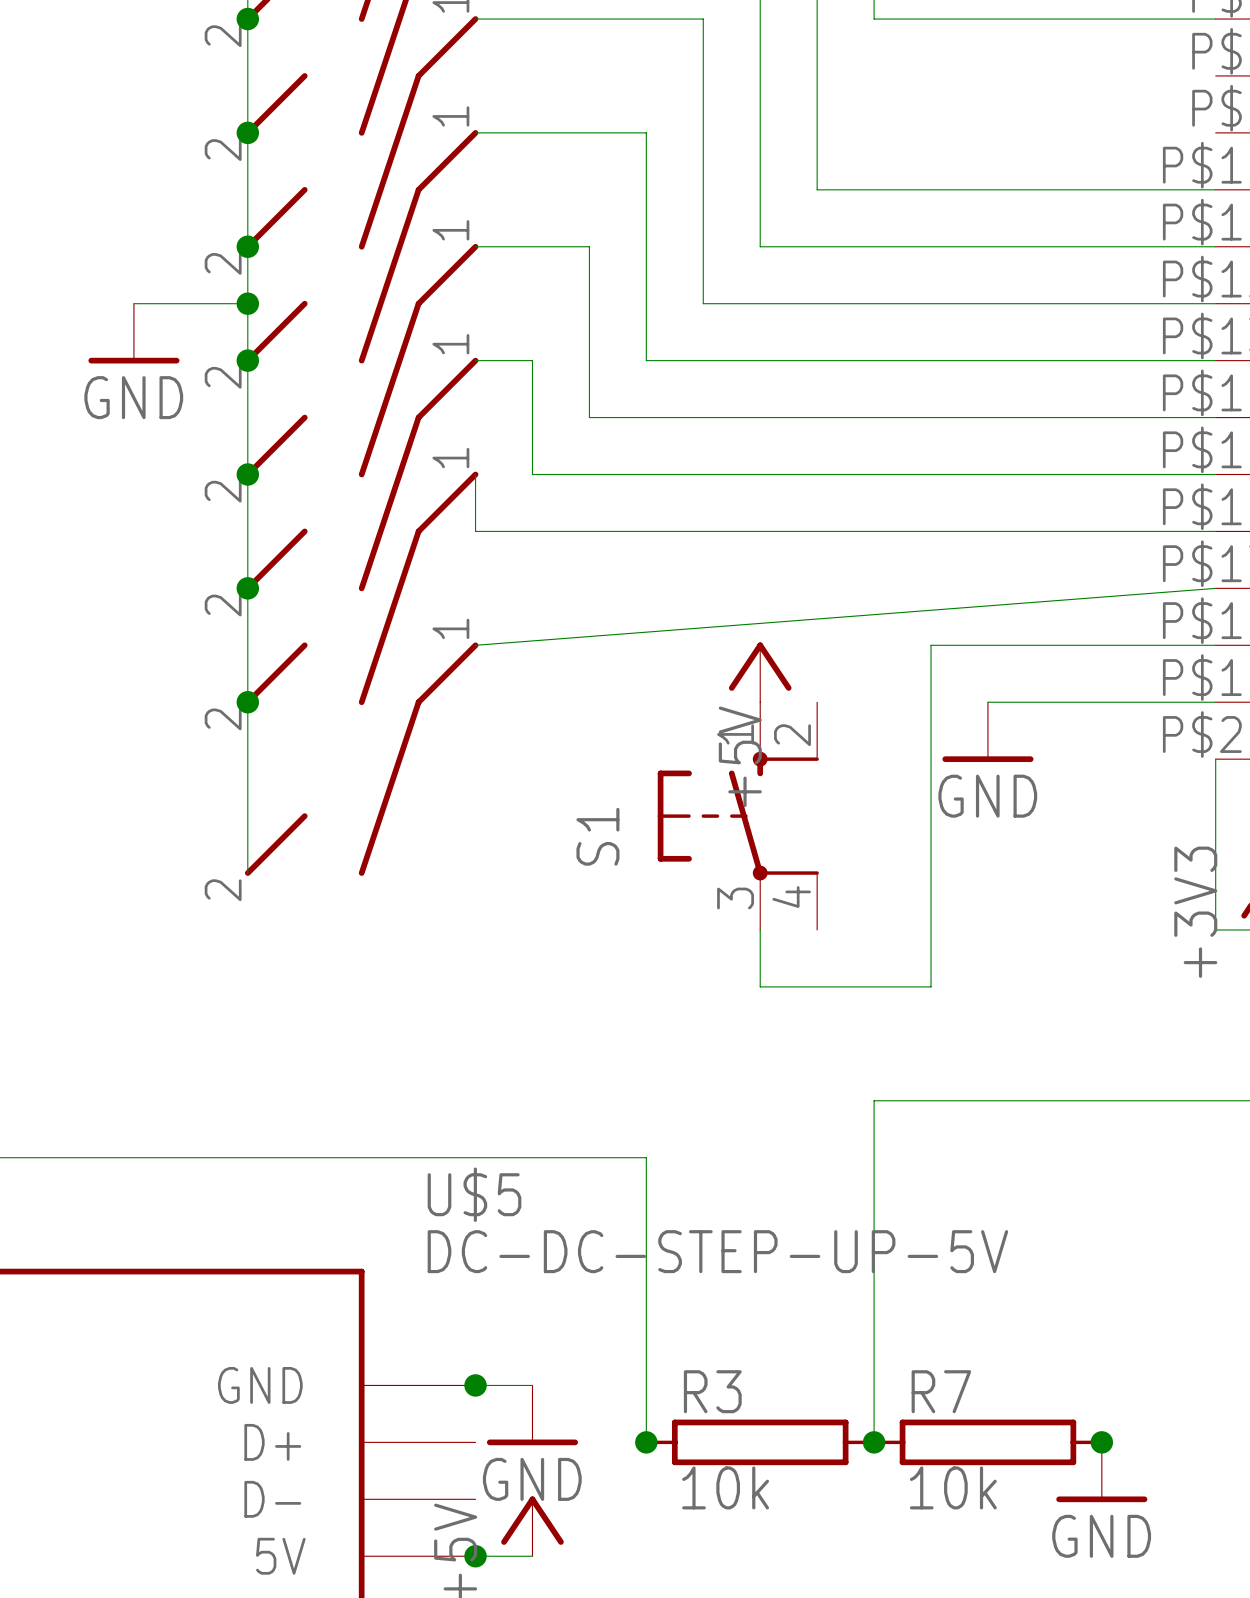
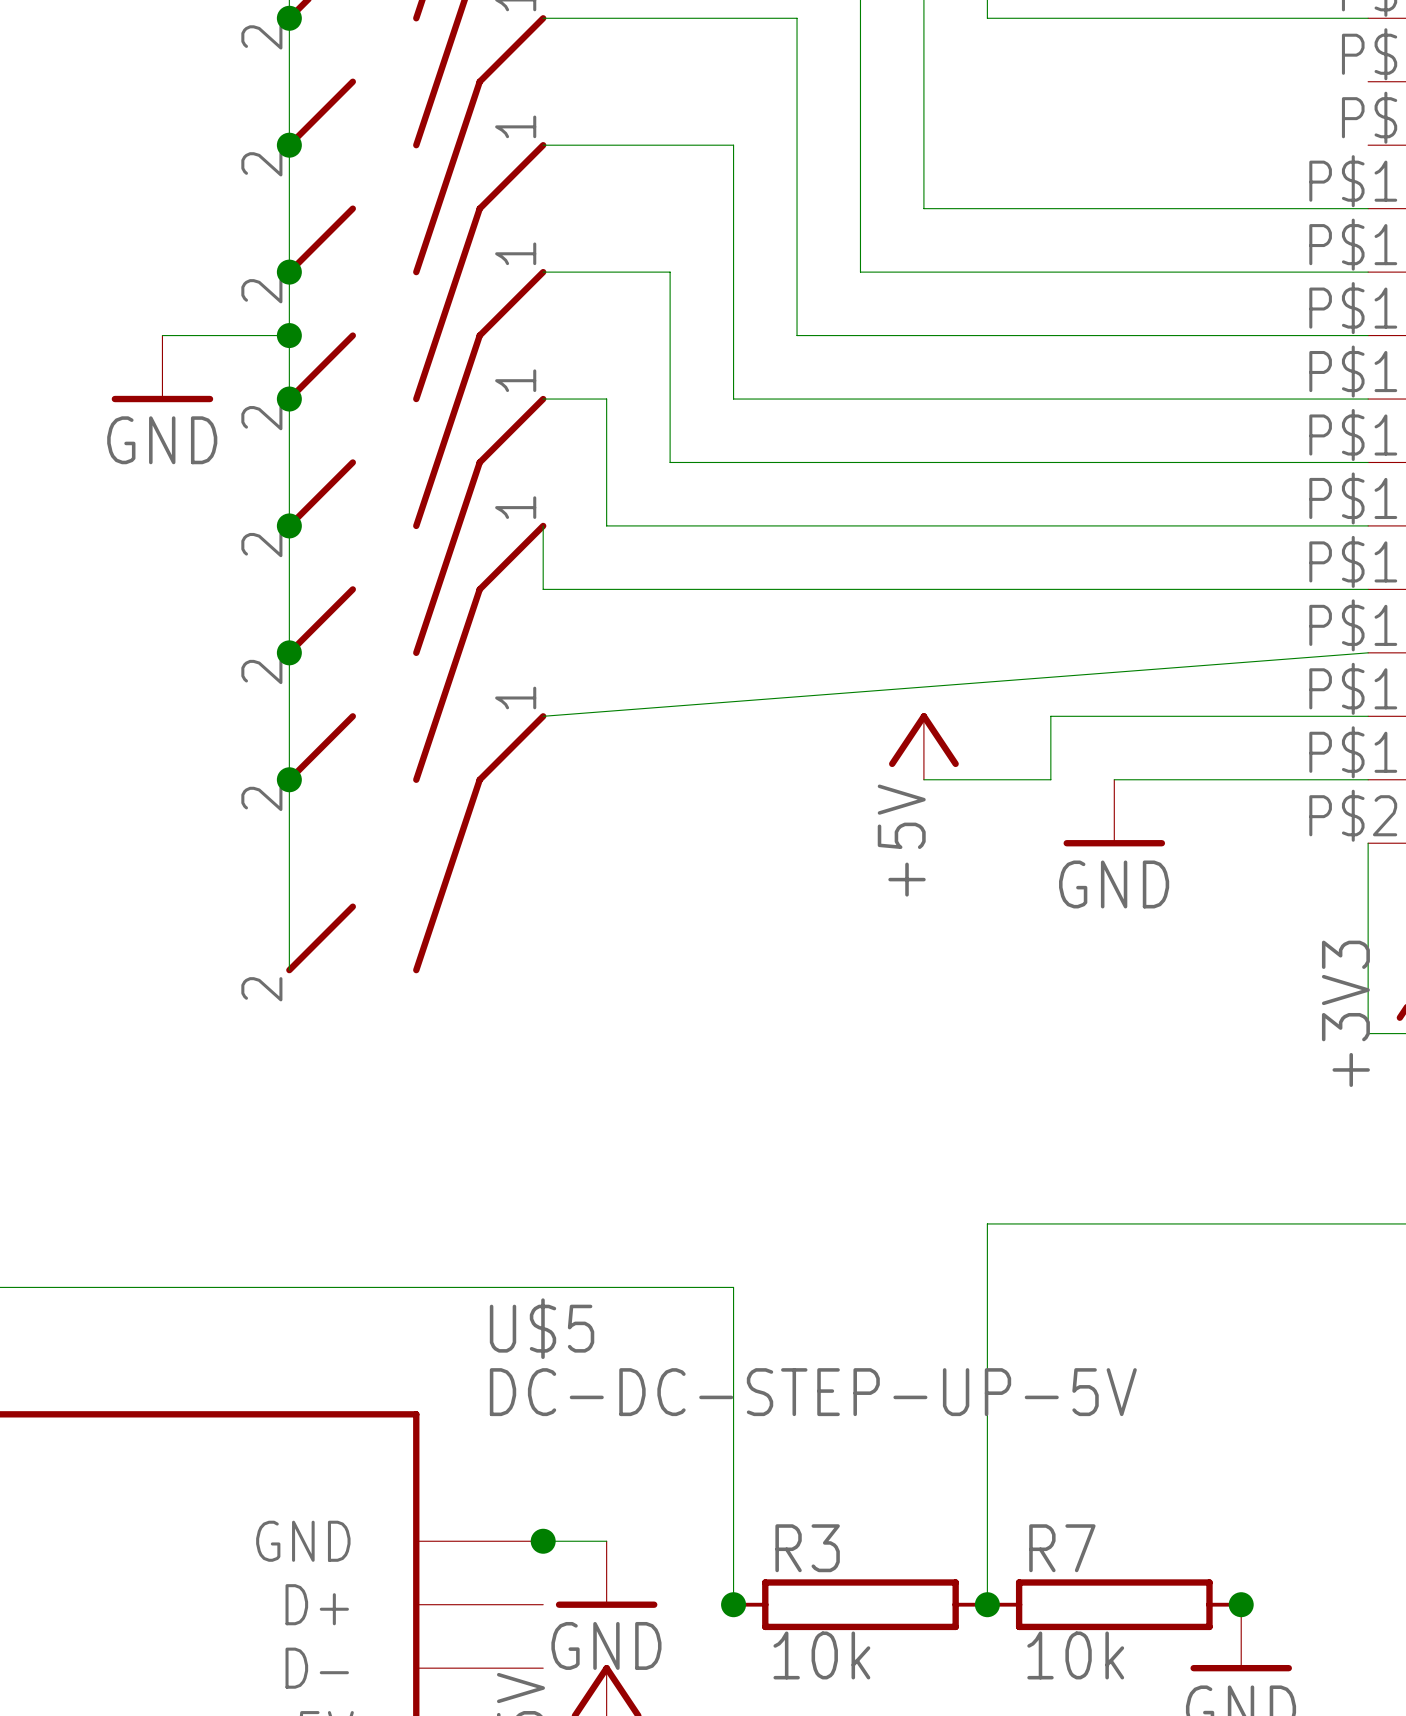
power symbol position: +5V (760, 672) -> +5V (923, 746)
wire: (931, 702) (931, 986) (760, 986) (760, 929) -> (1050, 779) (923, 779)
S1: (738, 816) -> none

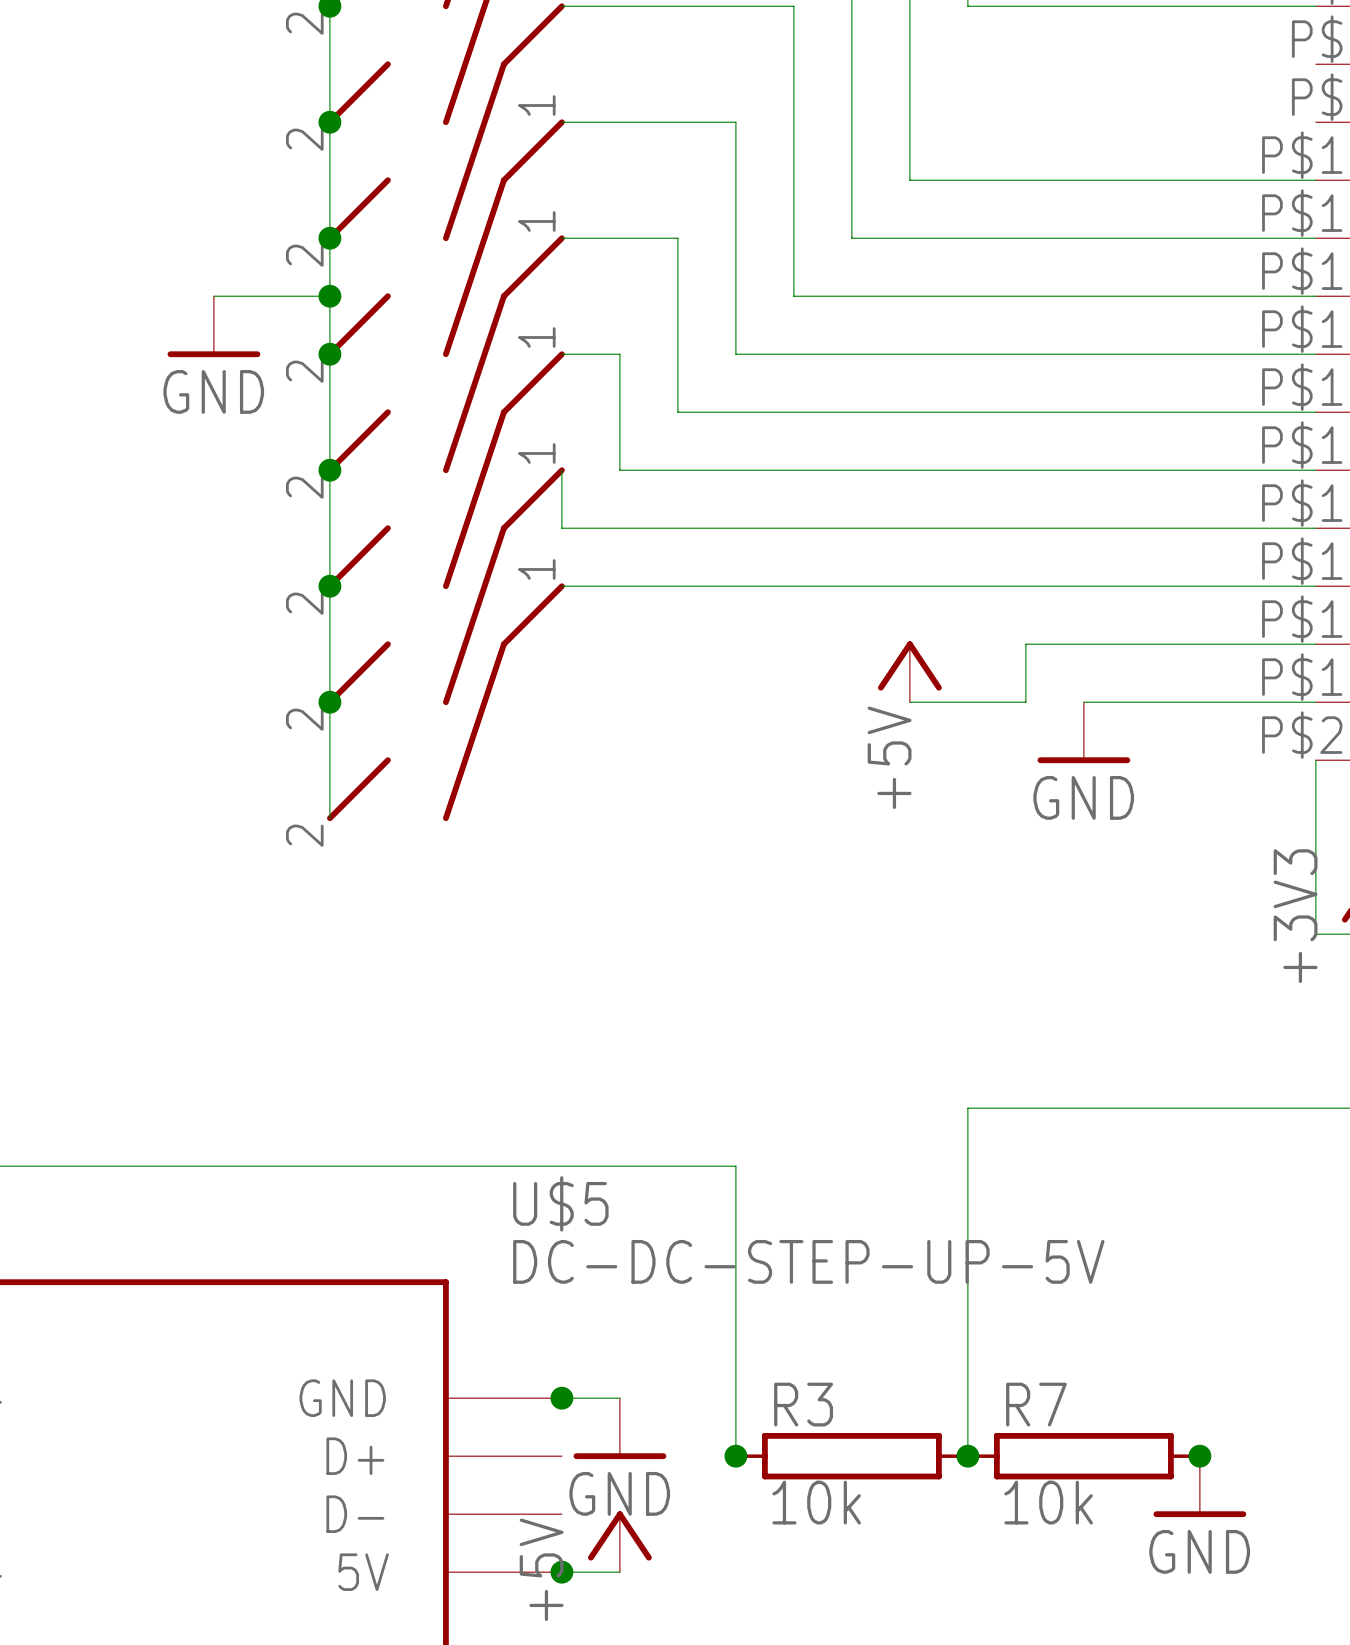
wire: (1368, 652) (543, 716) -> (1315, 586) (561, 586)
part position: (416, 843) -> (445, 702)
wire: (289, 906) (289, 970) -> none

